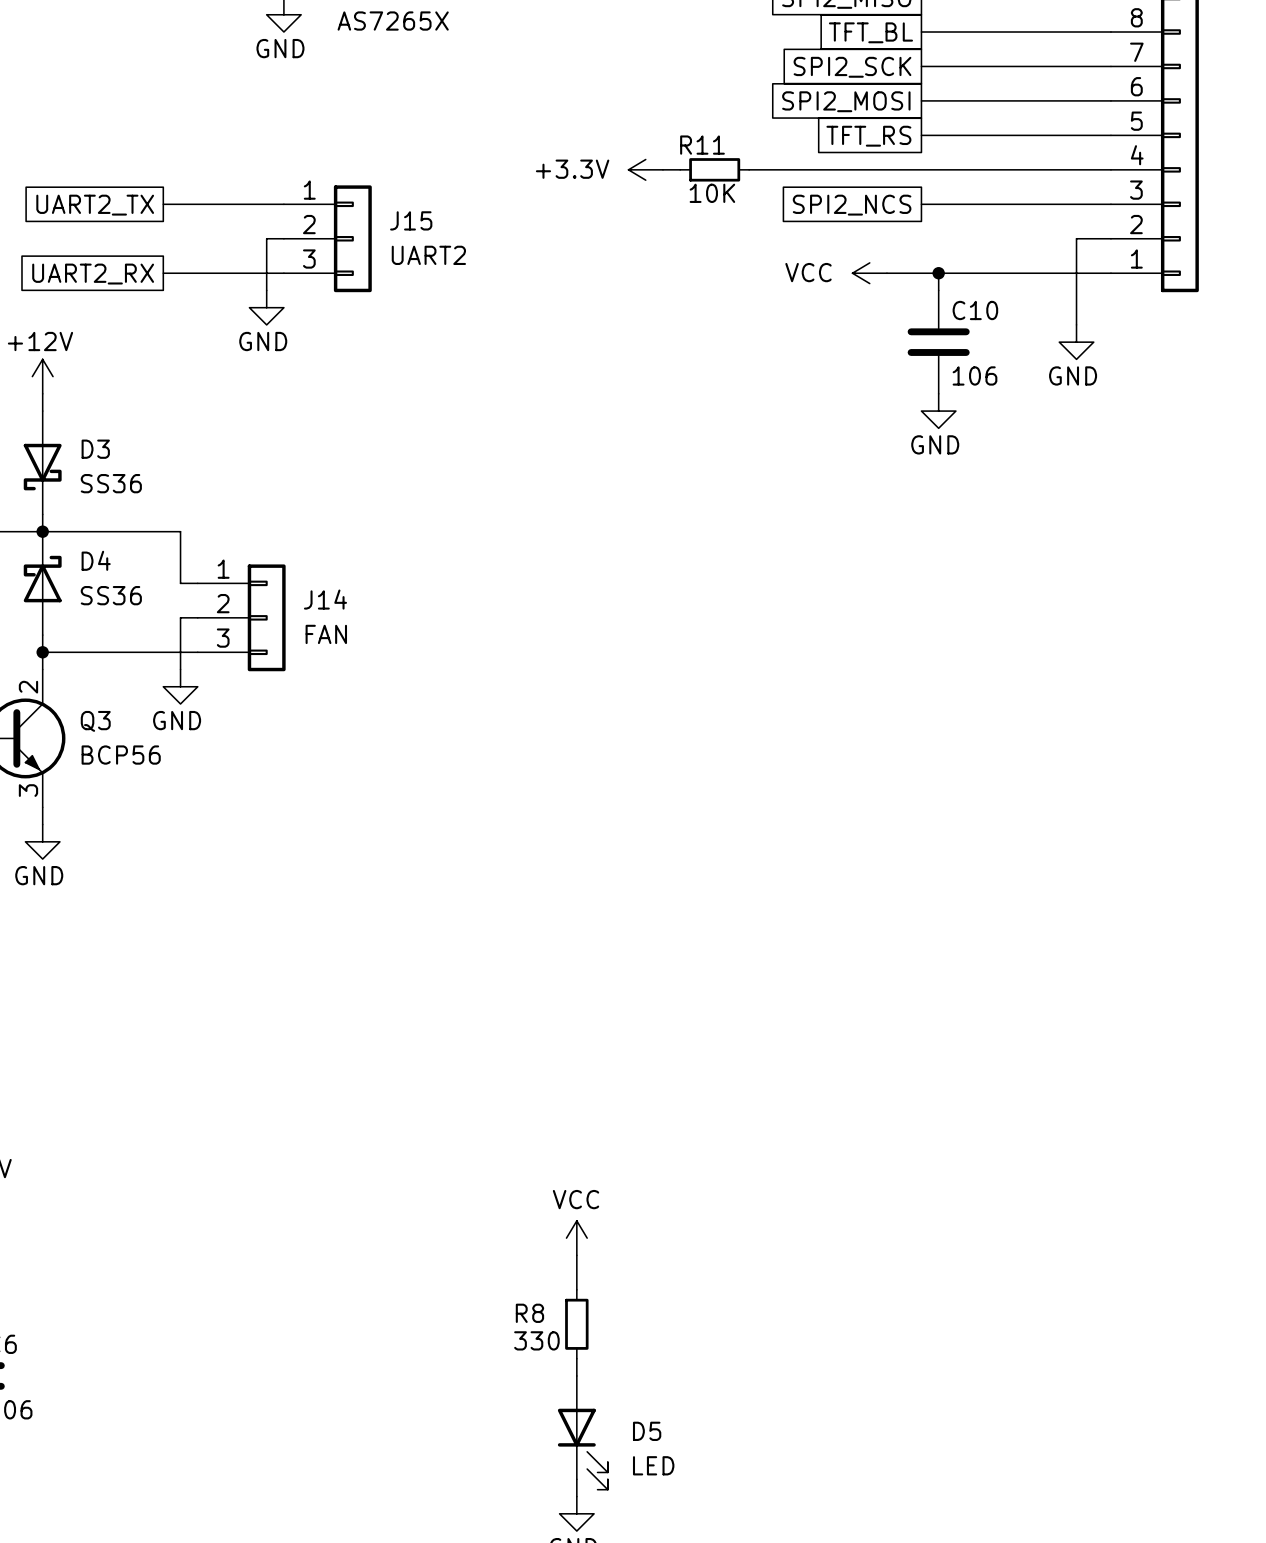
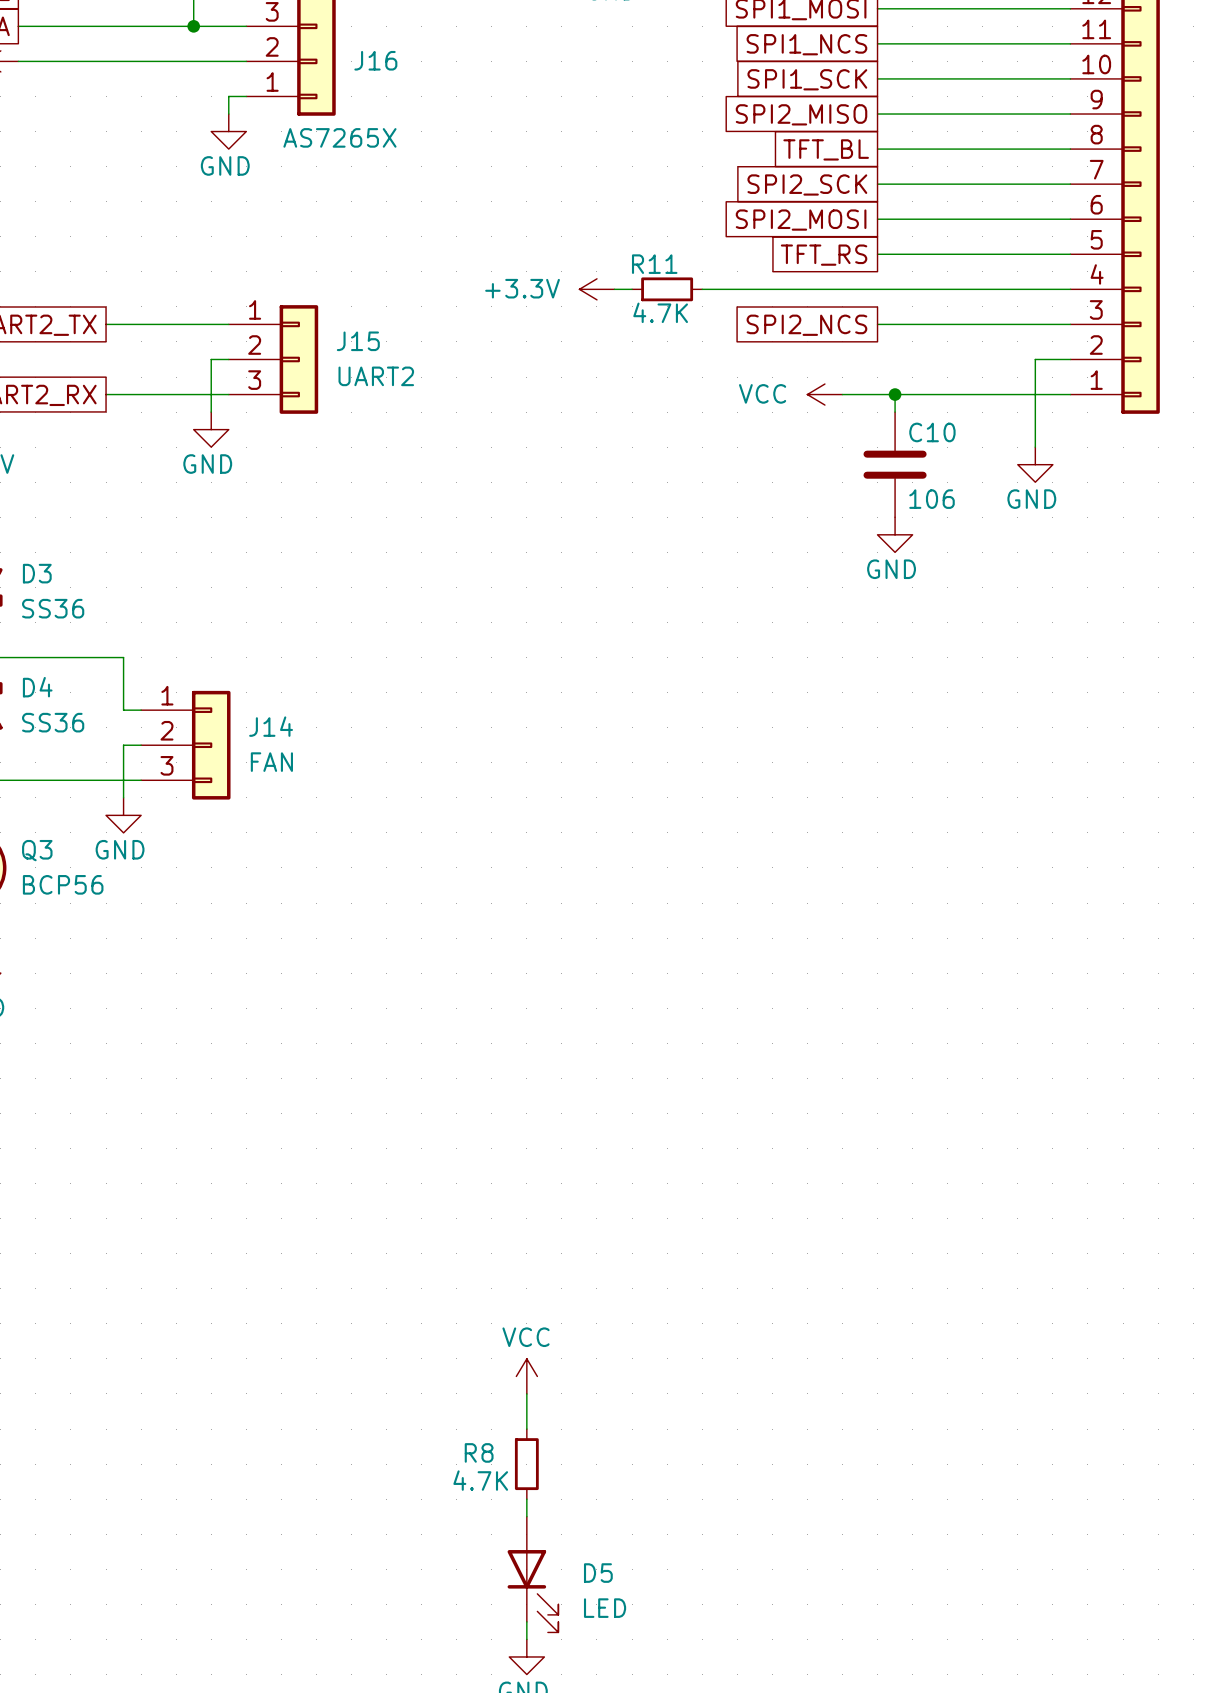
R11 value: 10K (712, 193) -> 4.7K (660, 312)
R8 value: 330 (536, 1340) -> 4.7K (480, 1480)

